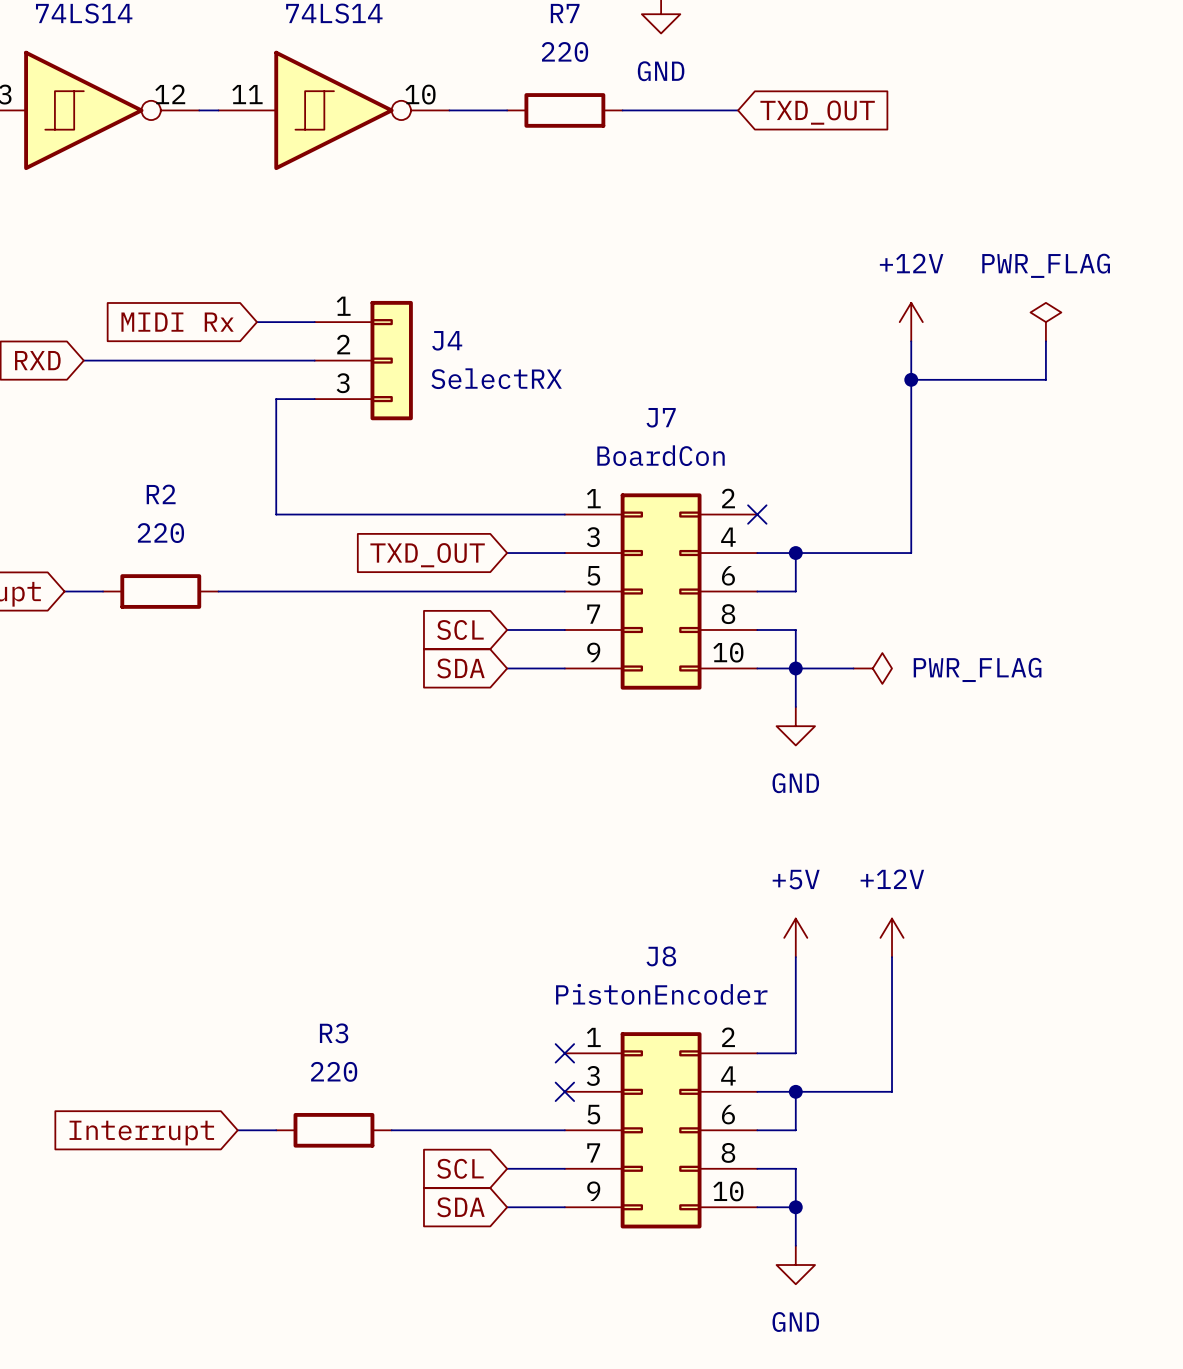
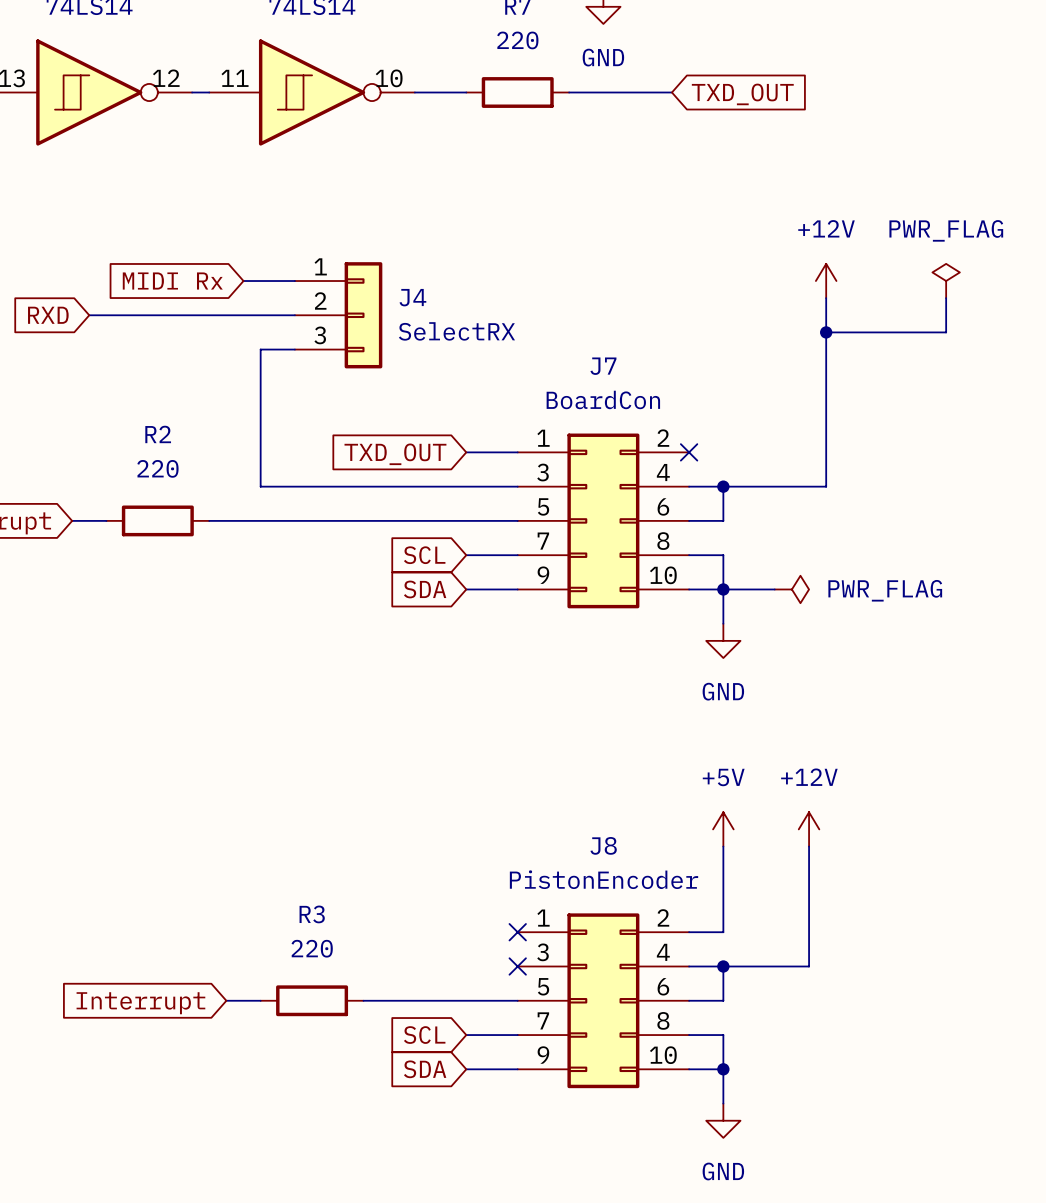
wire: (276, 514) (507, 514) -> (260, 452) (260, 486) (466, 486)
global label position: TXD_OUT (427, 555) -> TXD_OUT (395, 454)

